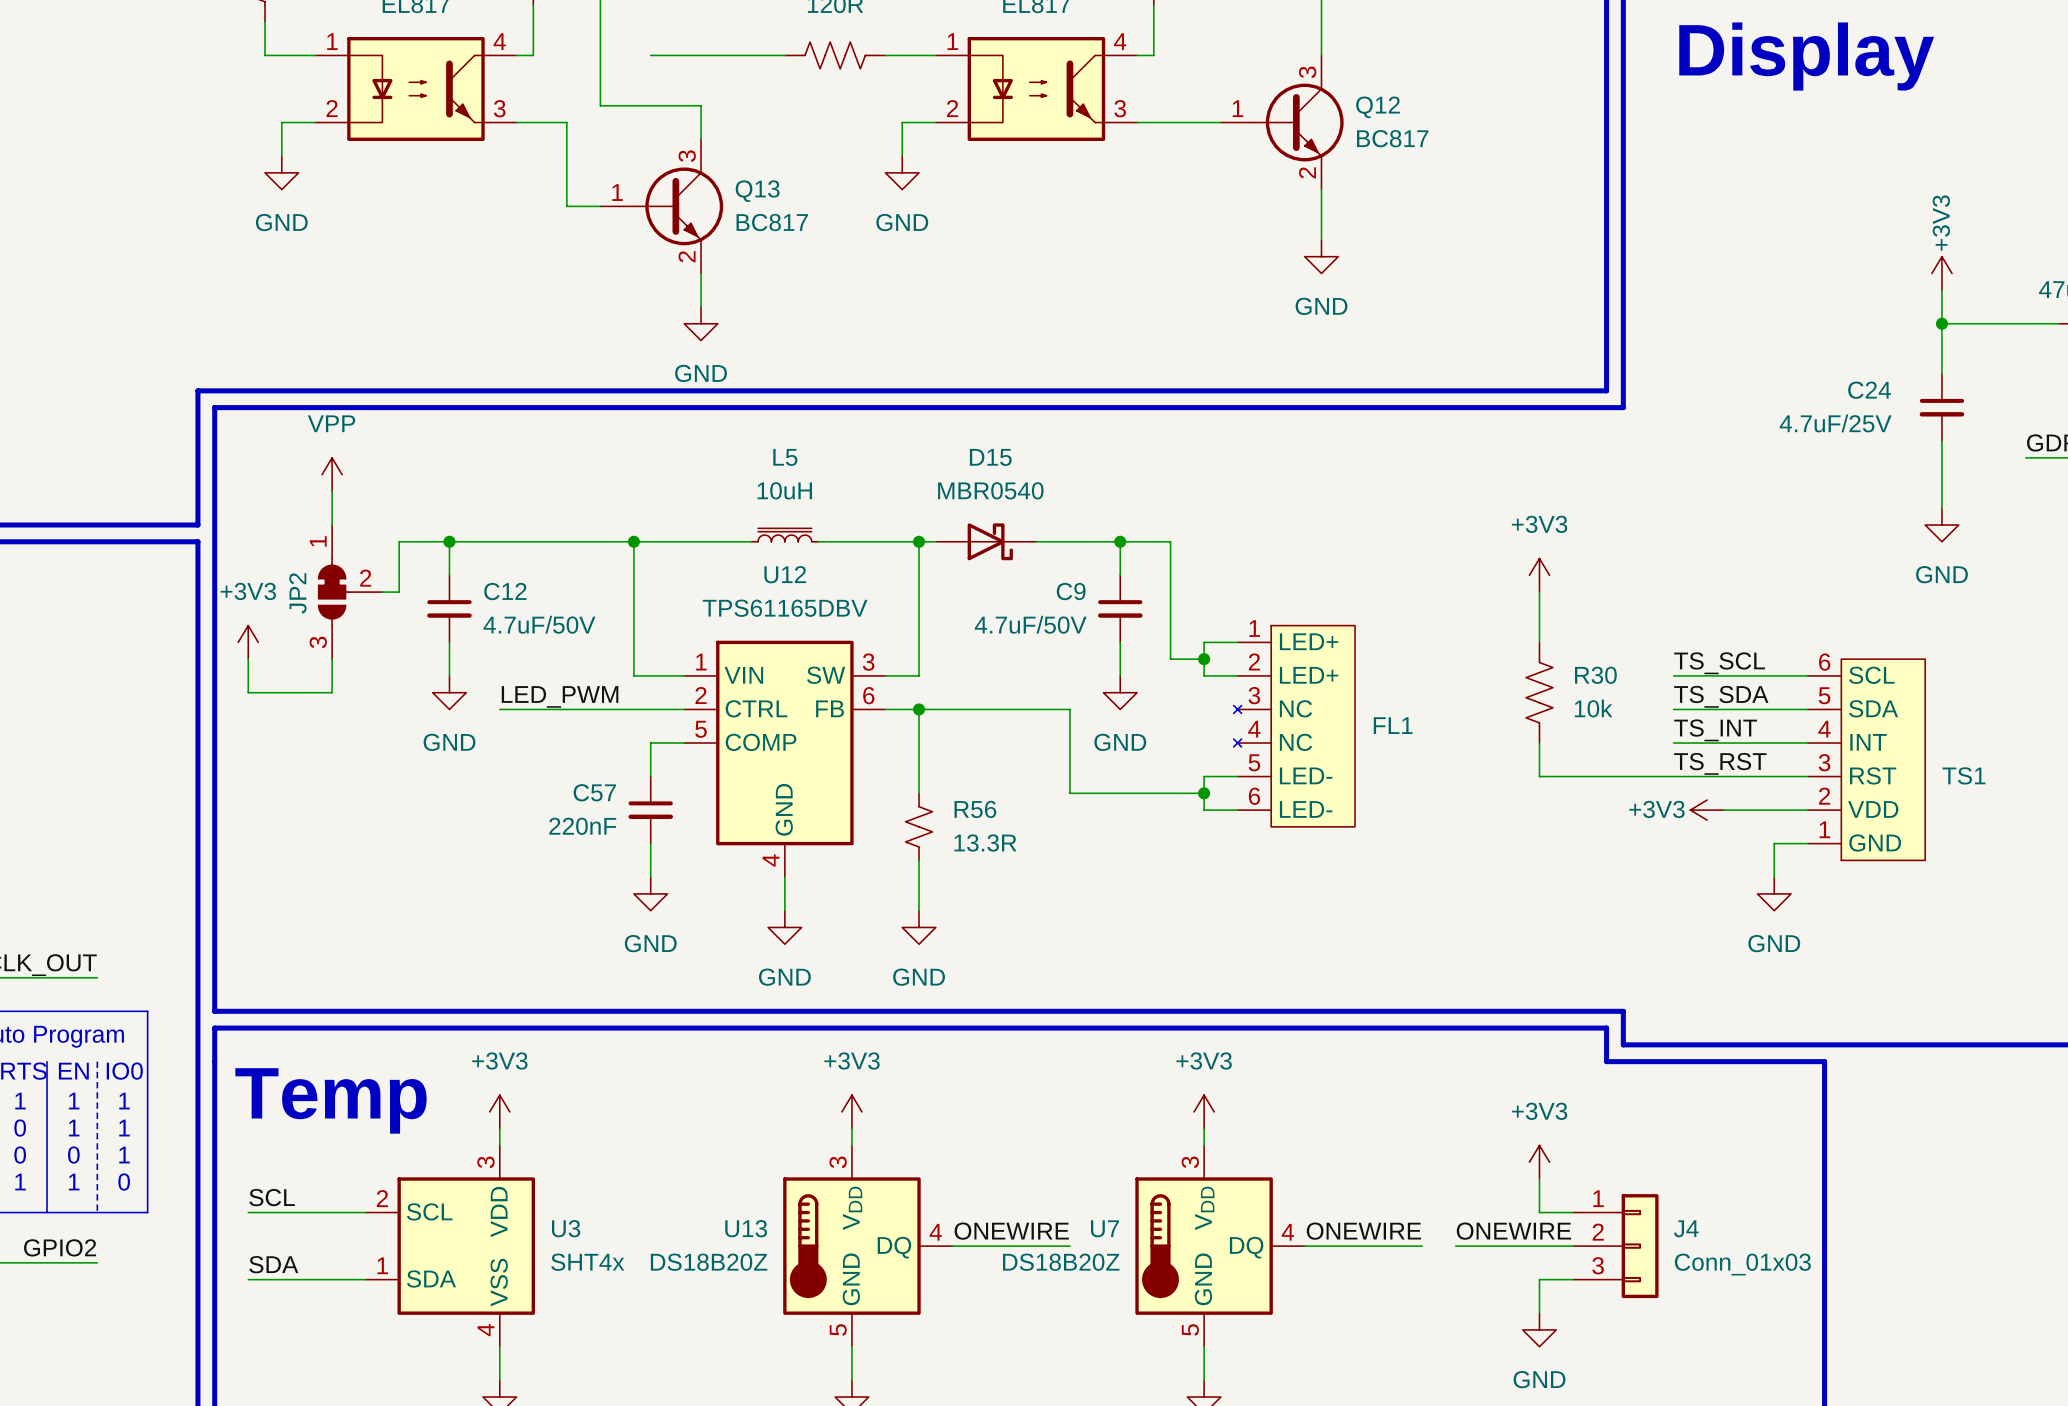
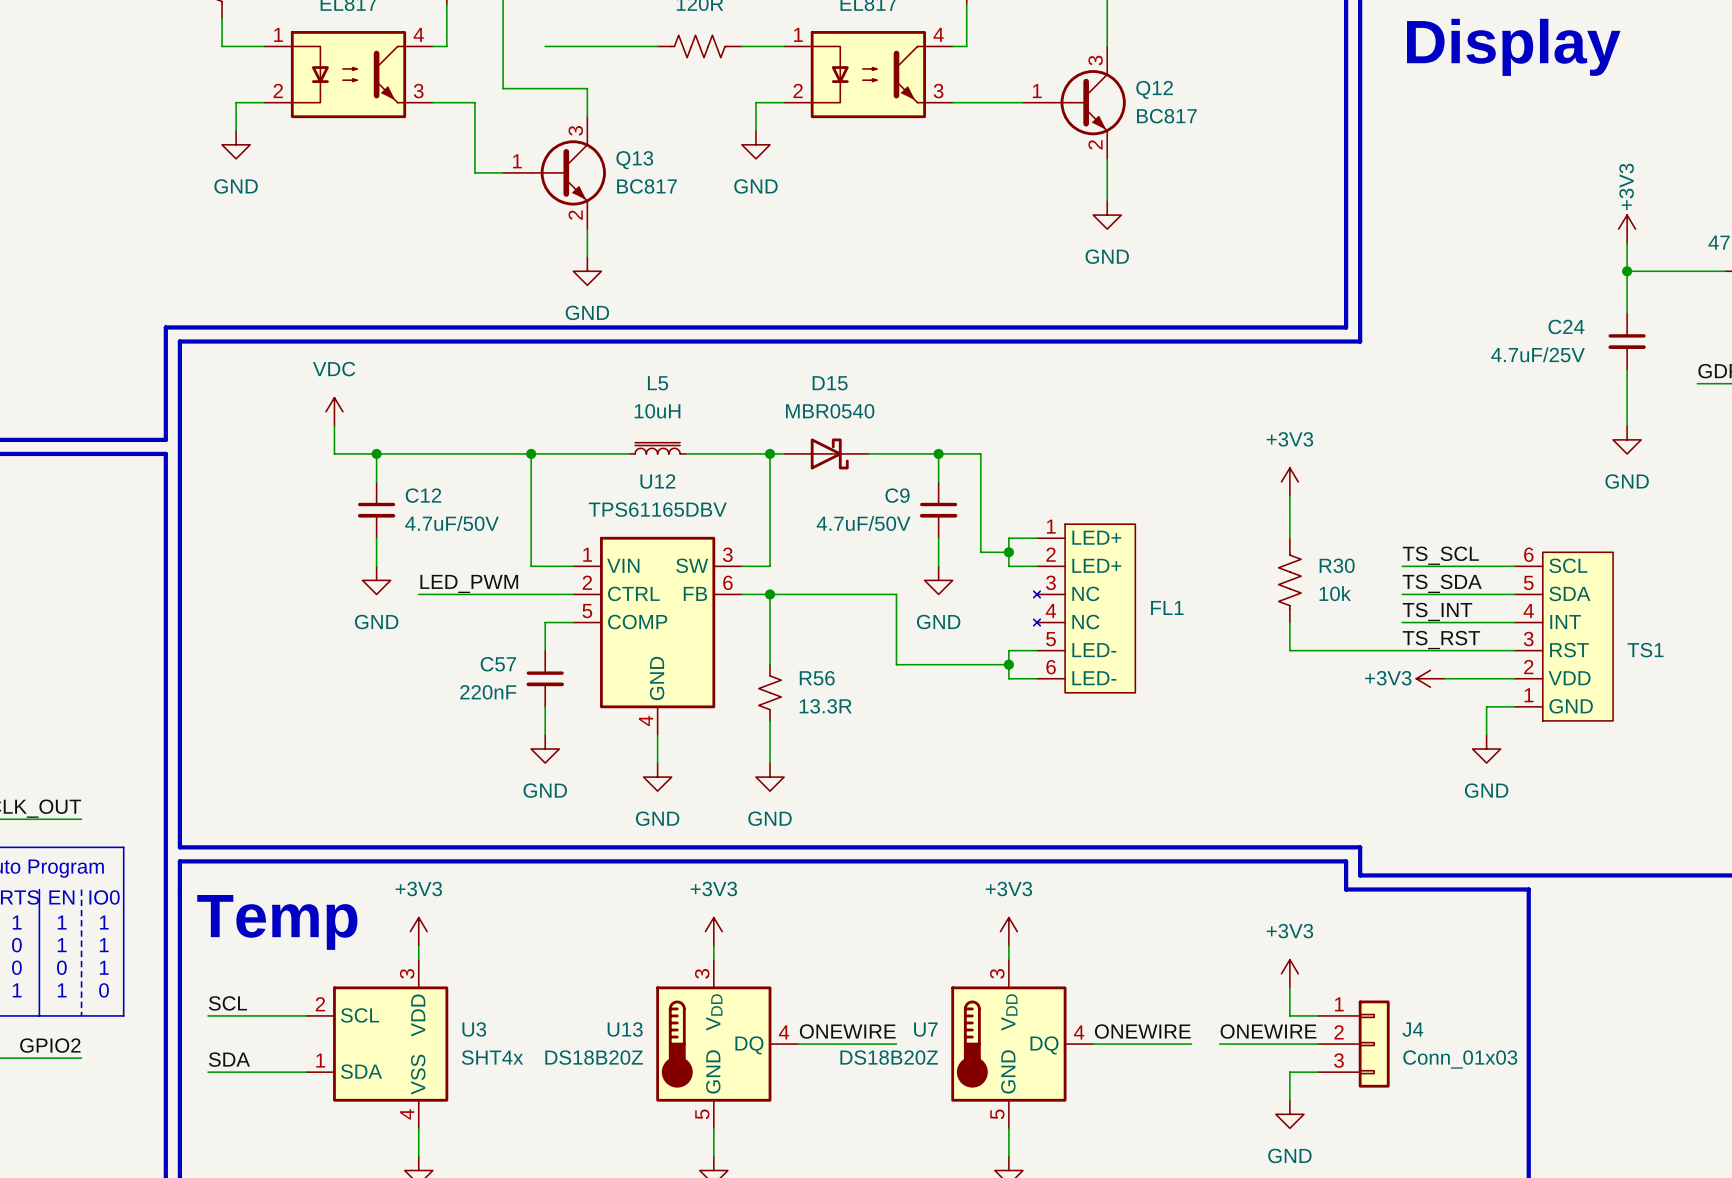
power symbol: VPP (332, 474) -> none
wire: (332, 491) (332, 525) -> none
power symbol: none -> VDC (334, 411)
wire: (399, 541) (399, 592) (382, 592) -> (334, 453) (334, 425)
JP2: (350, 592) -> none
power symbol: +3V3 (248, 642) -> none
wire: (248, 659) (248, 692) (332, 692) (332, 659) -> none

